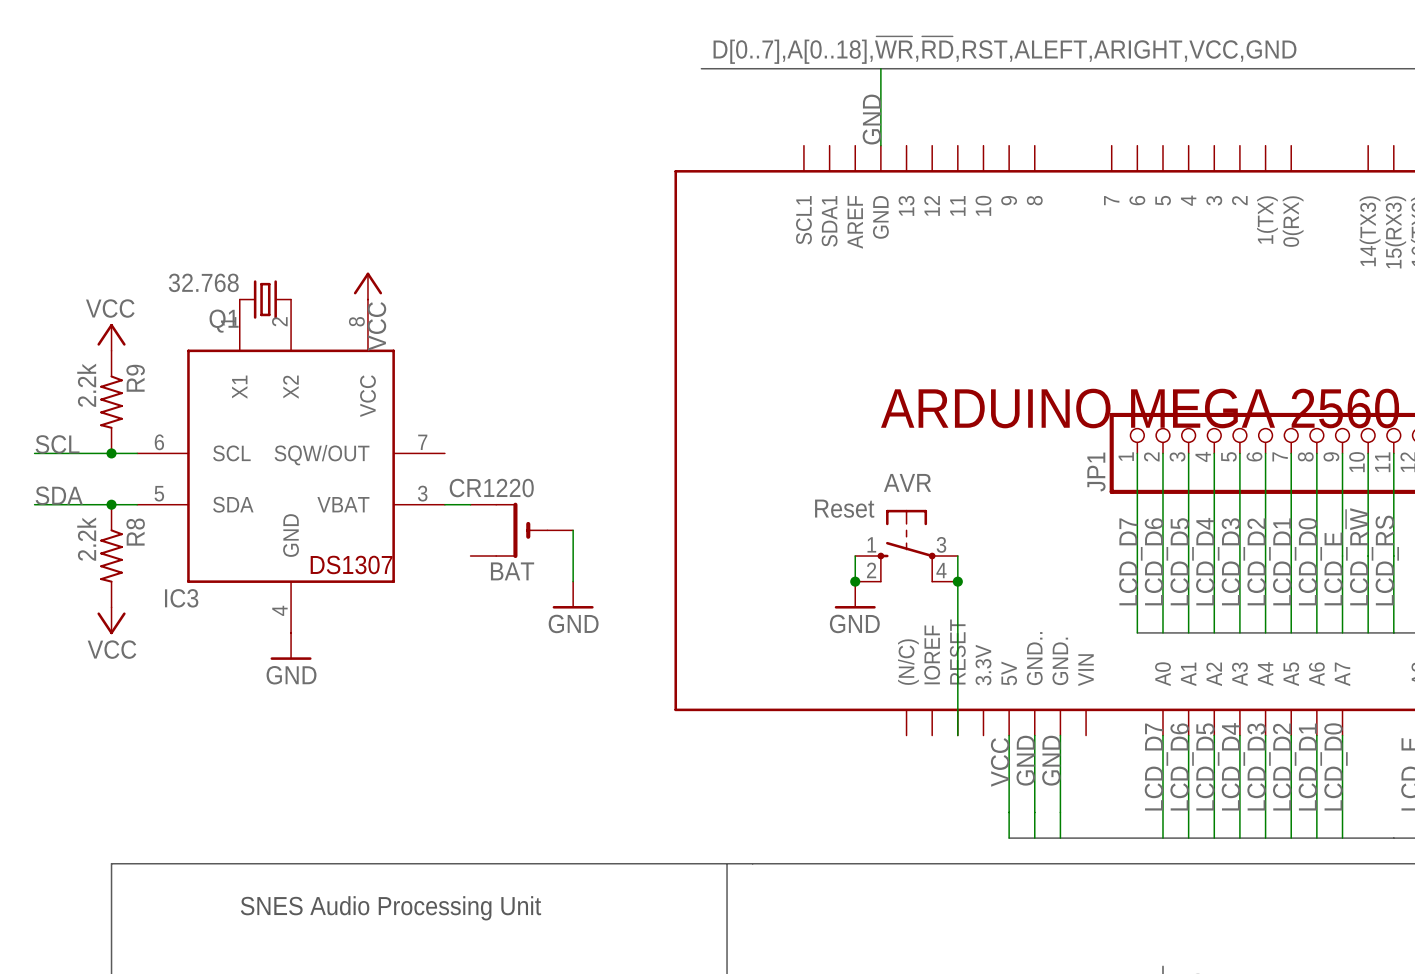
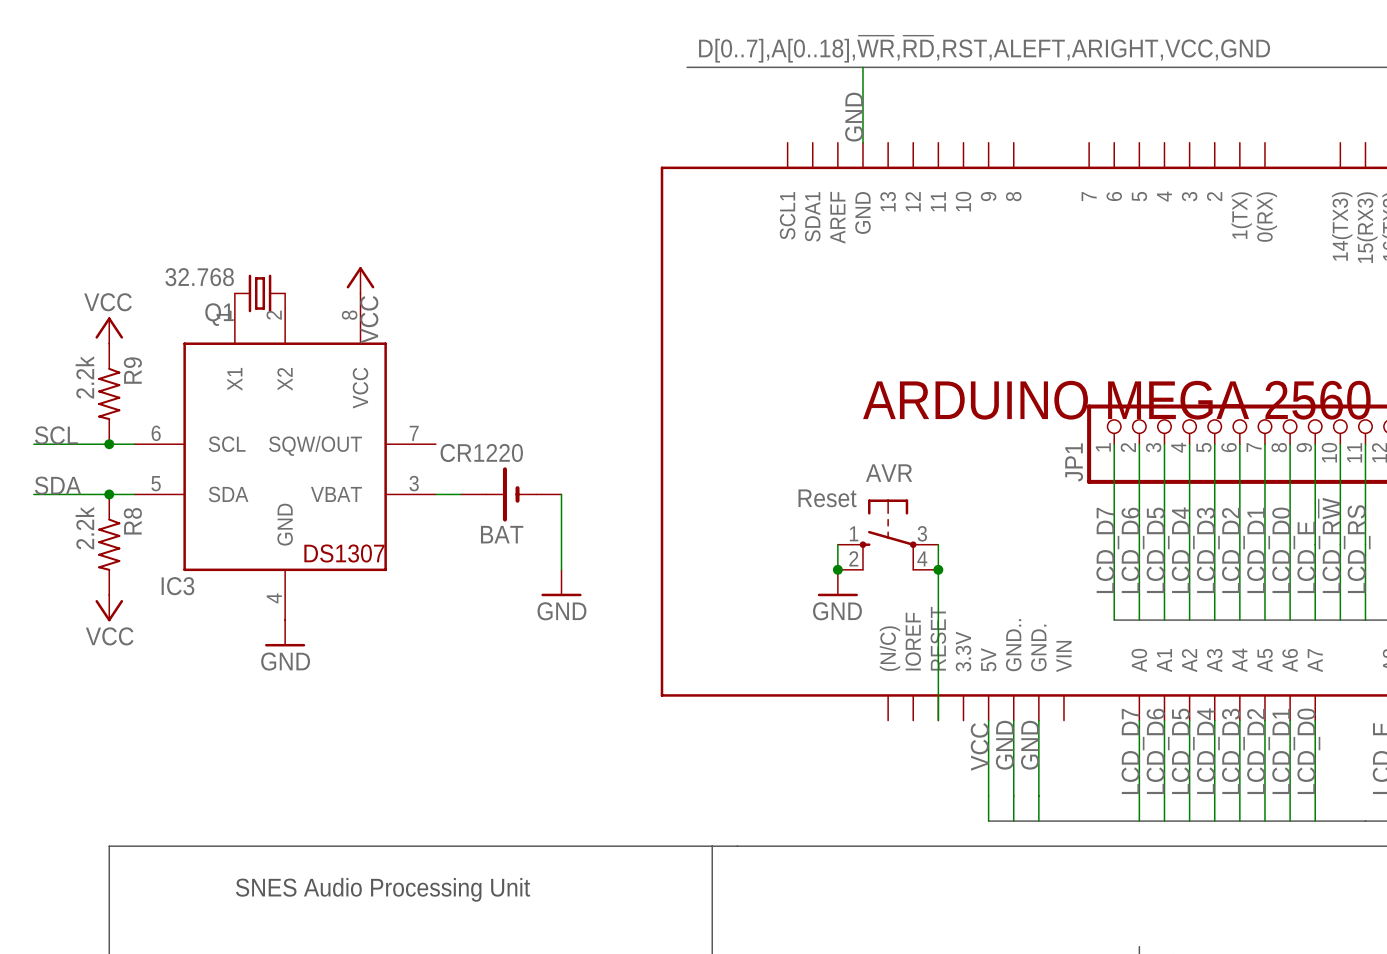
BAT: none -> CR1220 (511, 494)
wire: none -> (561, 494) (561, 519)
BAT: CR1220 (521, 530) -> none

